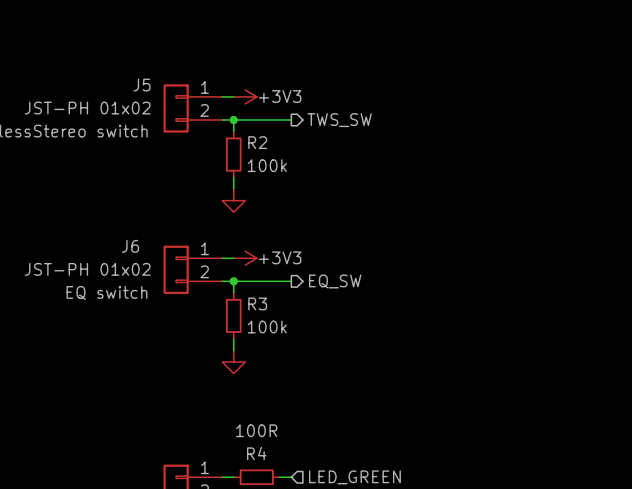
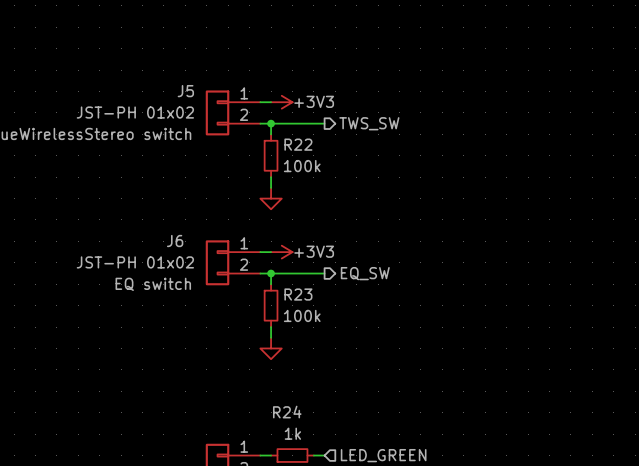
R2 name: R2 (257, 142) -> R22 (298, 144)
R3 name: R3 (257, 303) -> R23 (298, 294)
R4 value: 100R (256, 430) -> 1k (292, 433)
R4 name: R4 (256, 453) -> R24 (287, 412)

